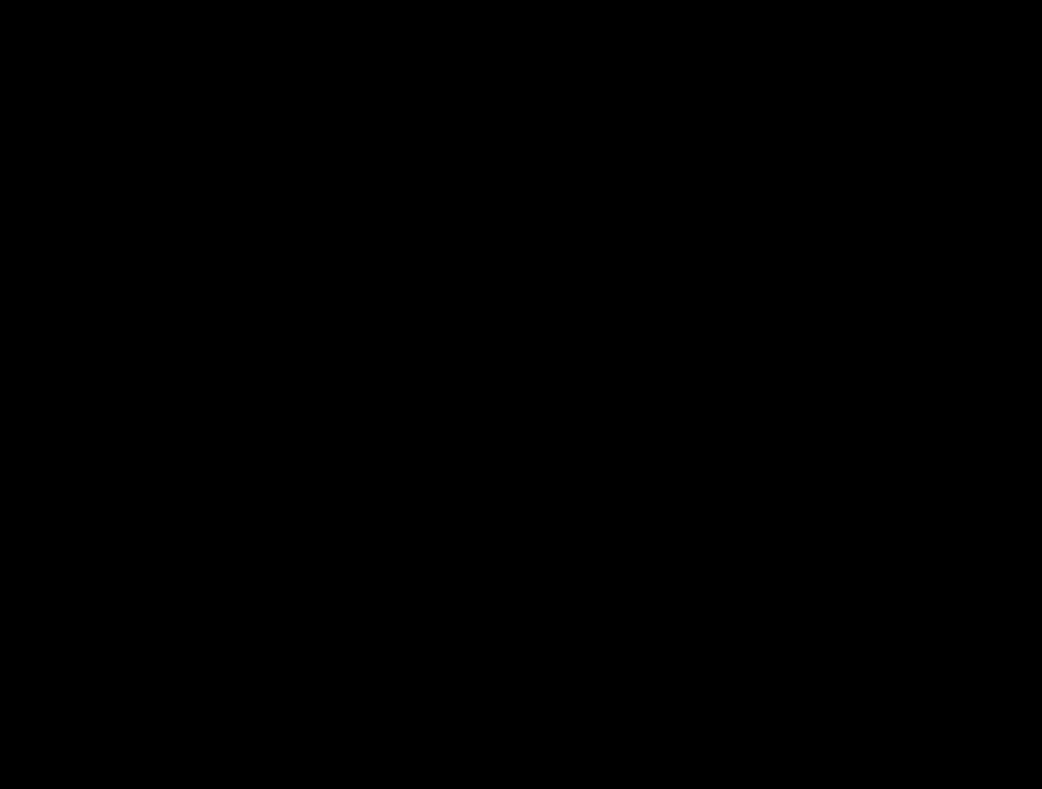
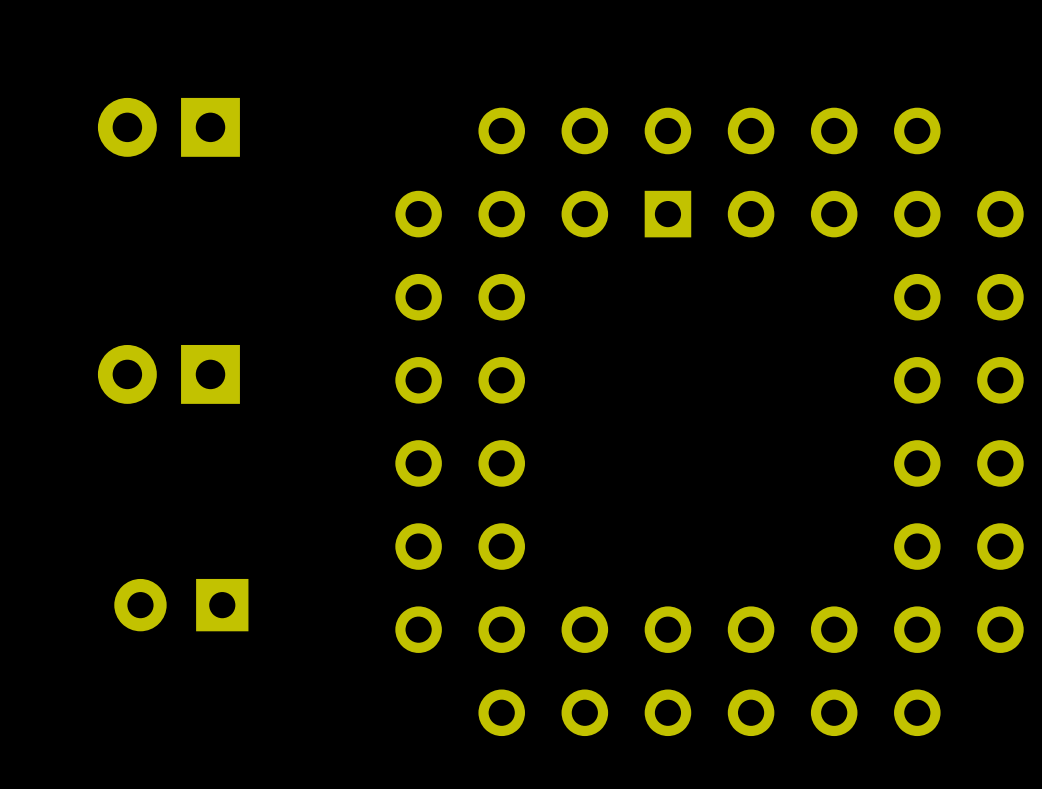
part: none -> (168, 127)
part: none -> (168, 374)
part: none -> (709, 421)
part: none -> (181, 605)

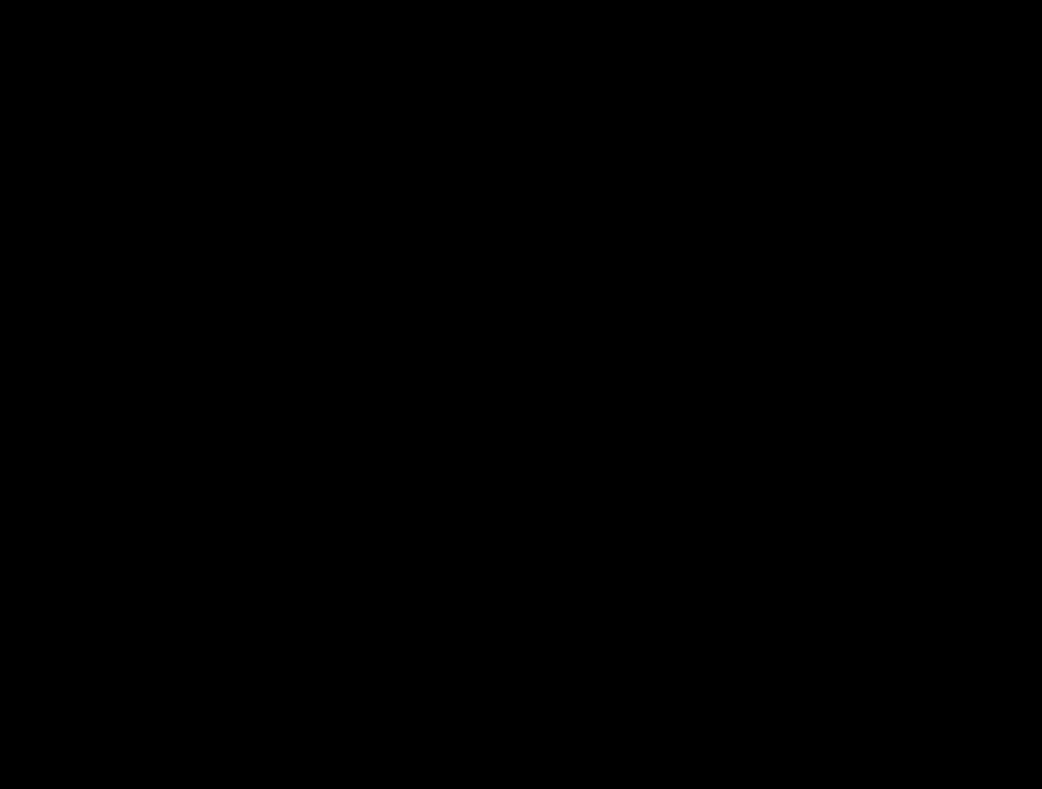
part: (168, 127) -> none
part: (168, 374) -> none
part: (709, 421) -> none
part: (181, 605) -> none

